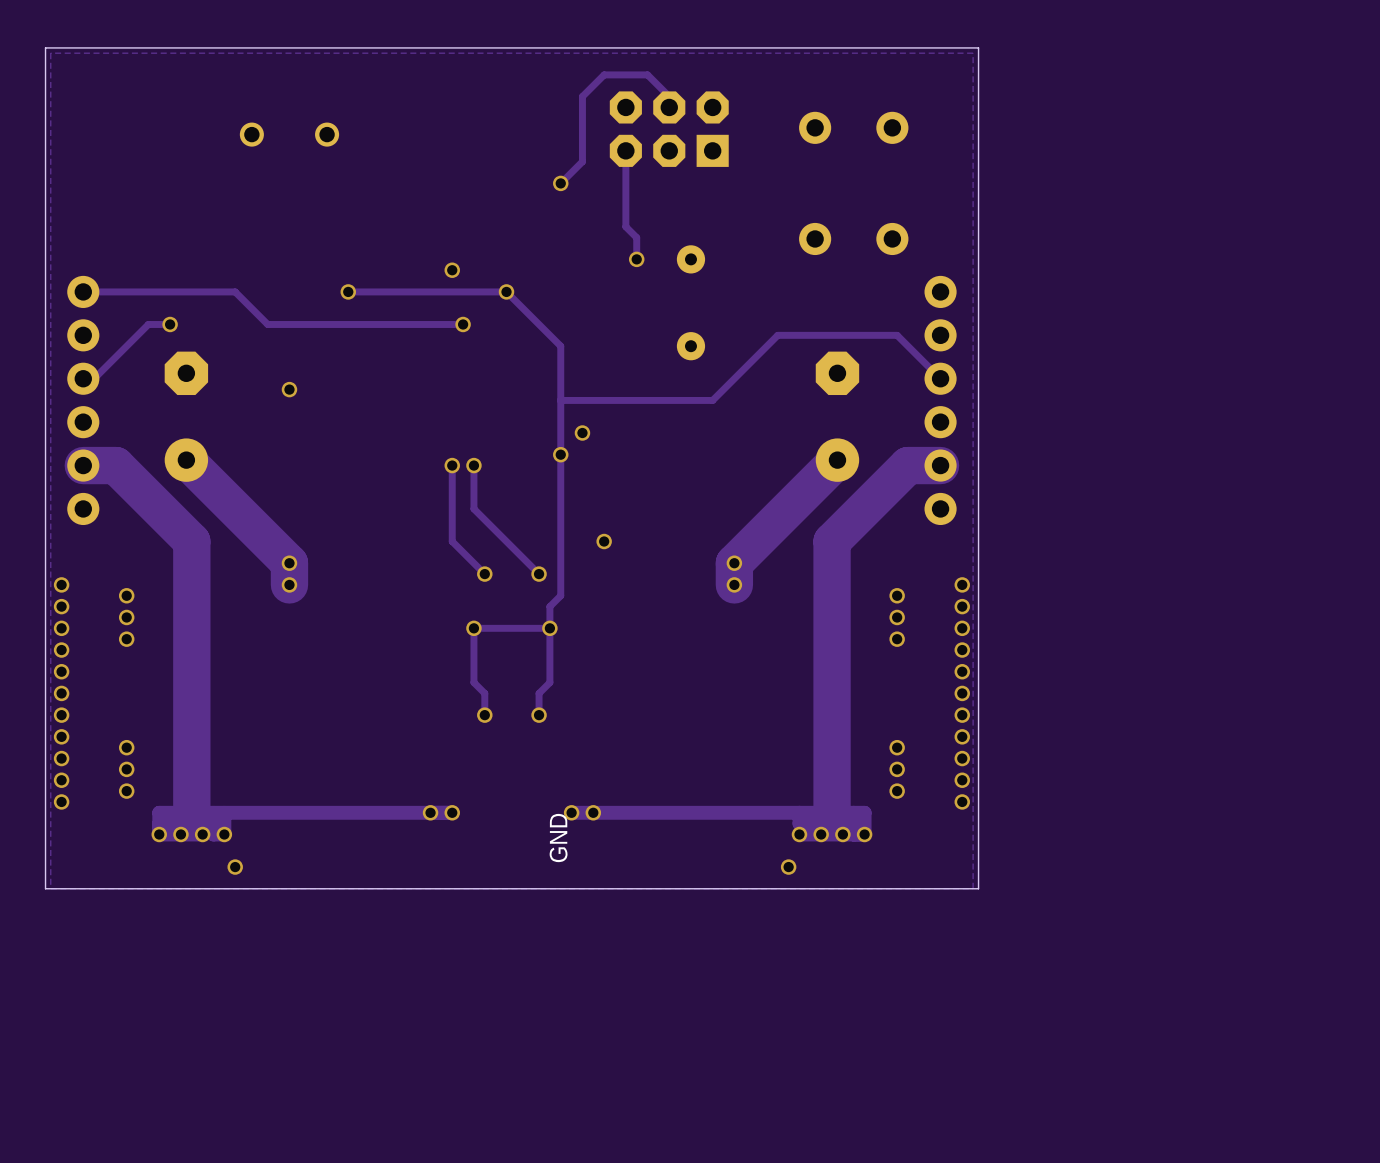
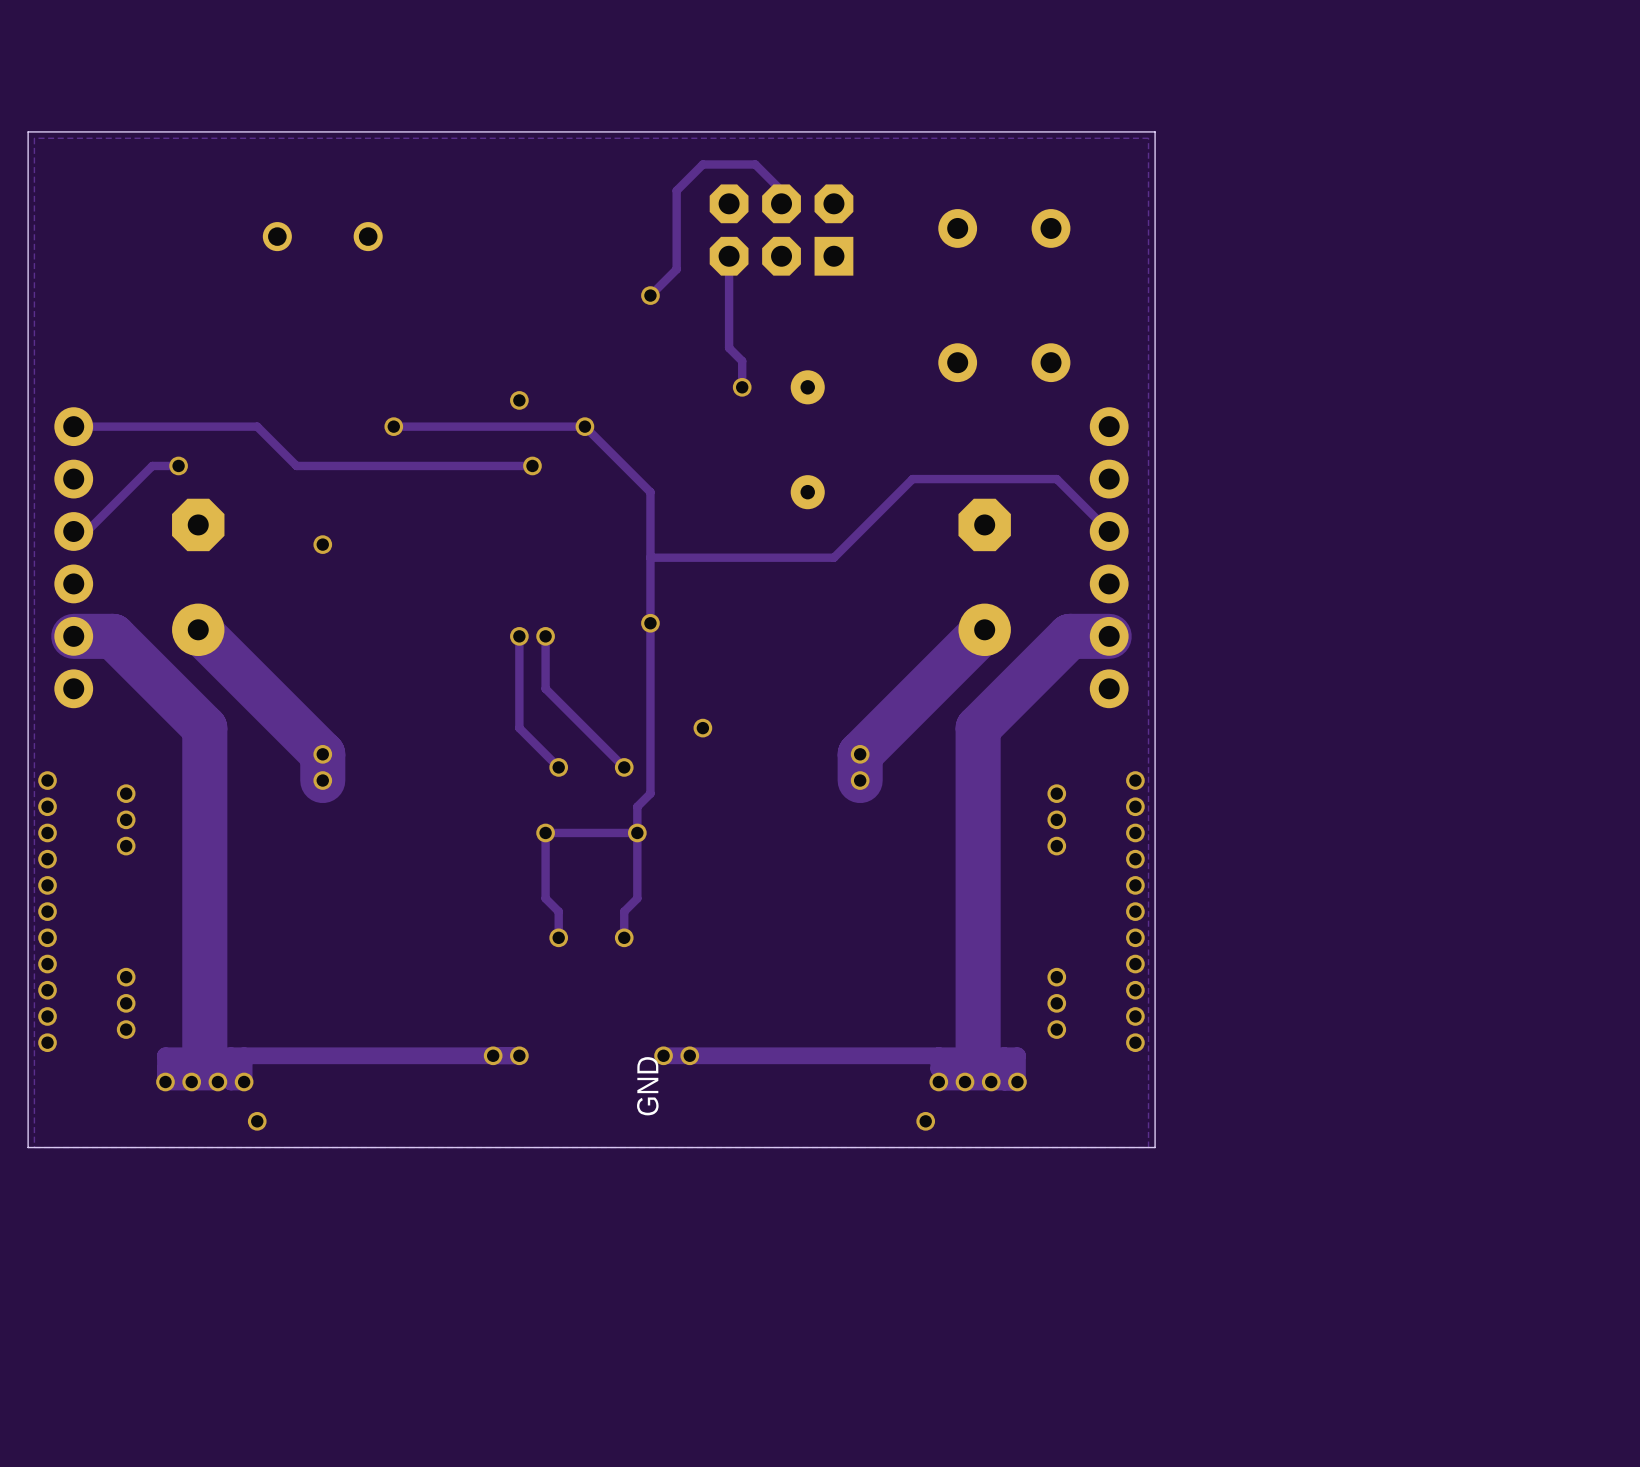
via: (582, 433) -> none

